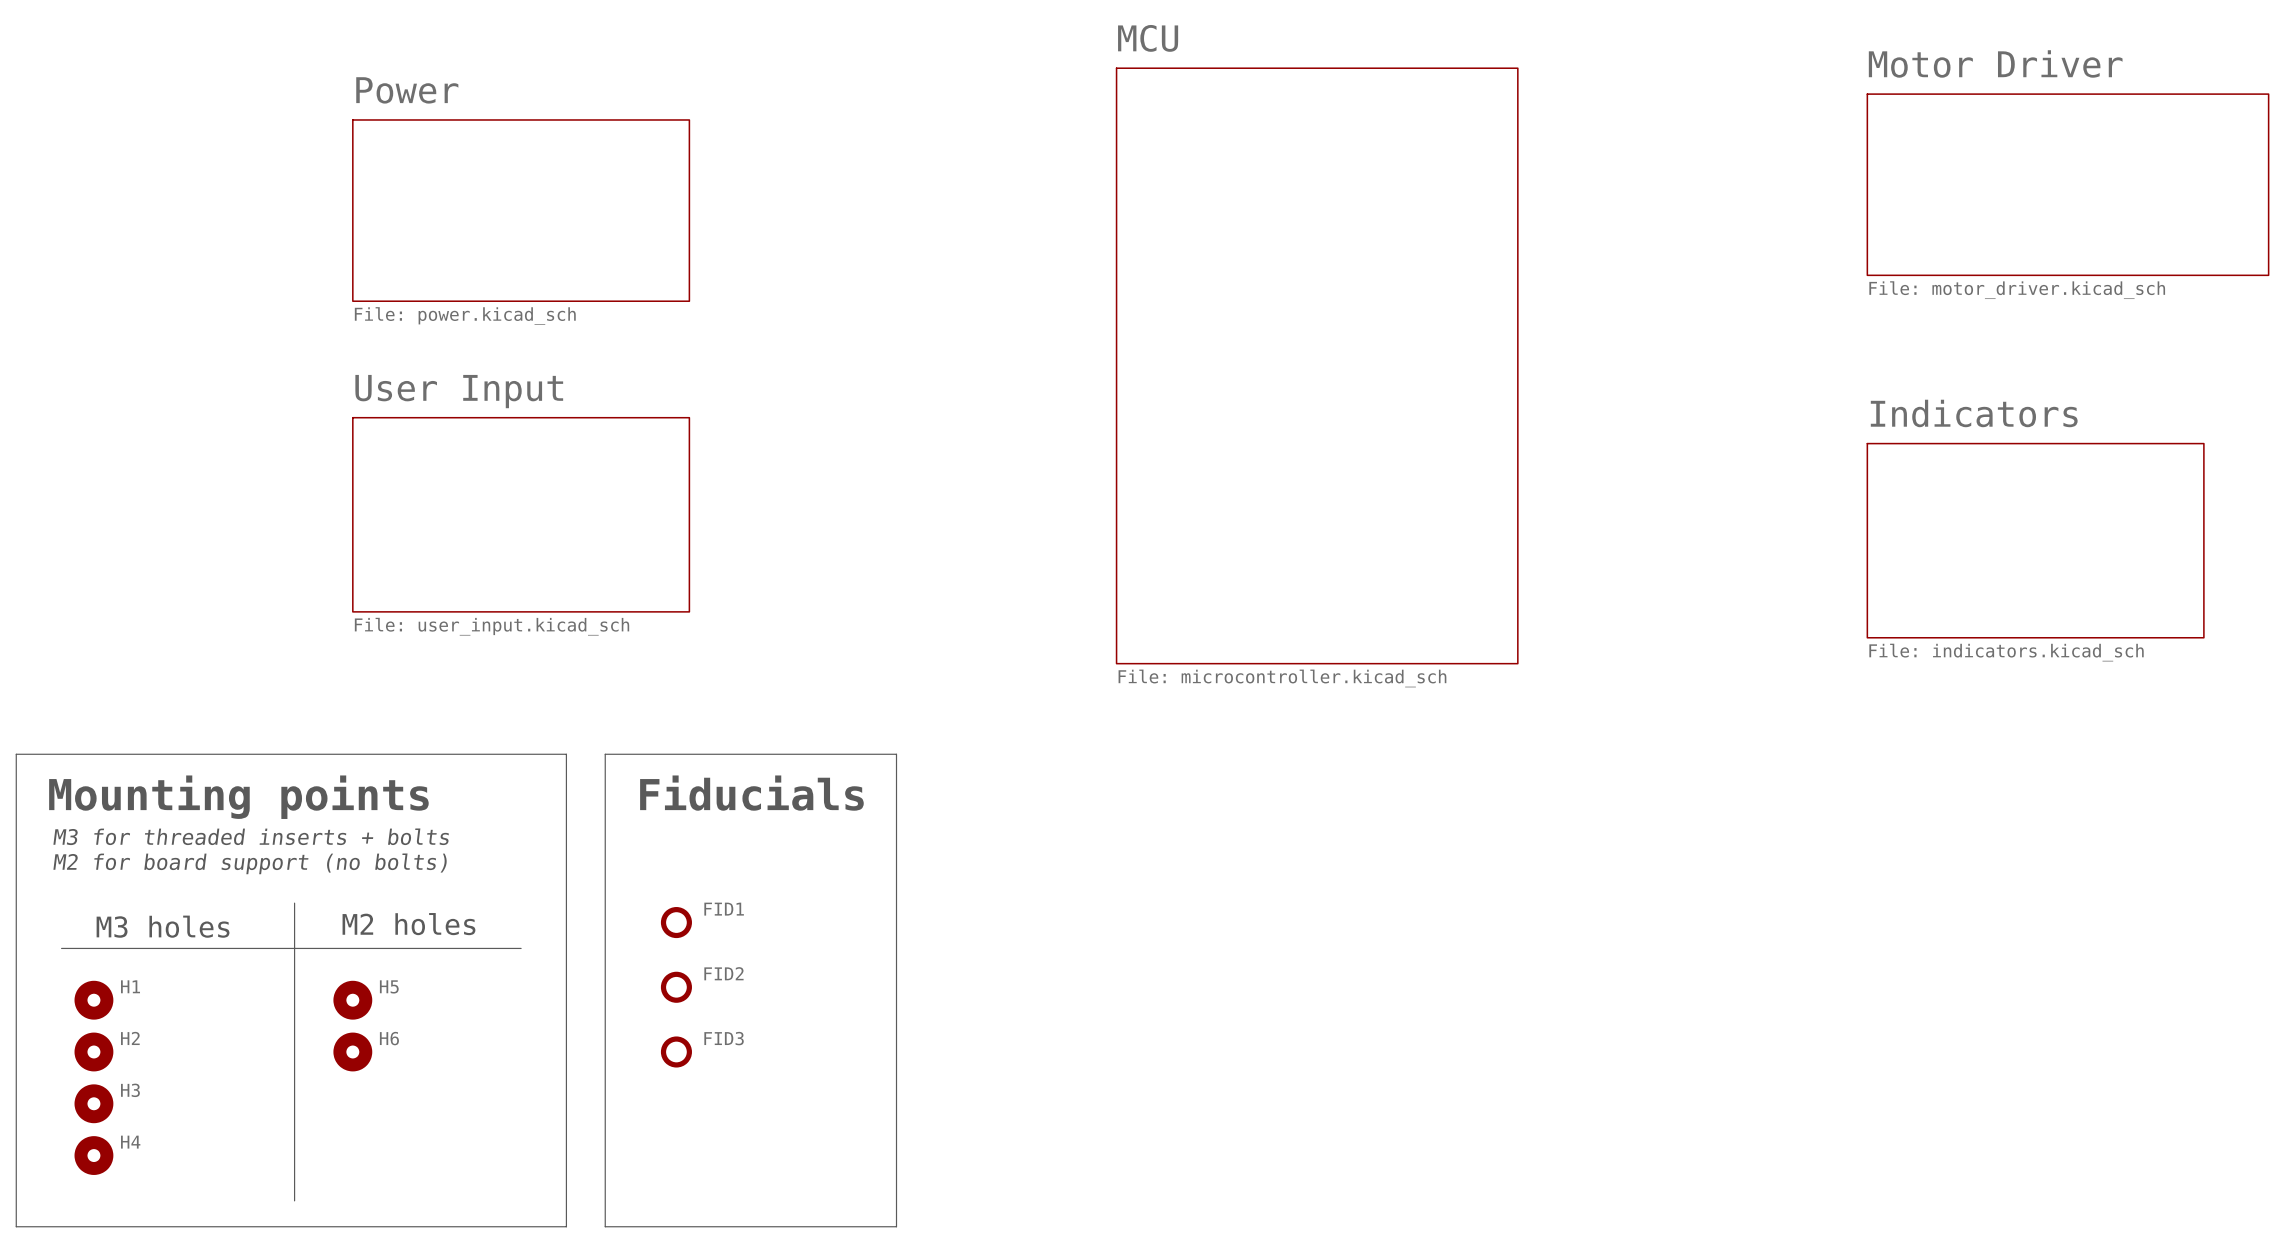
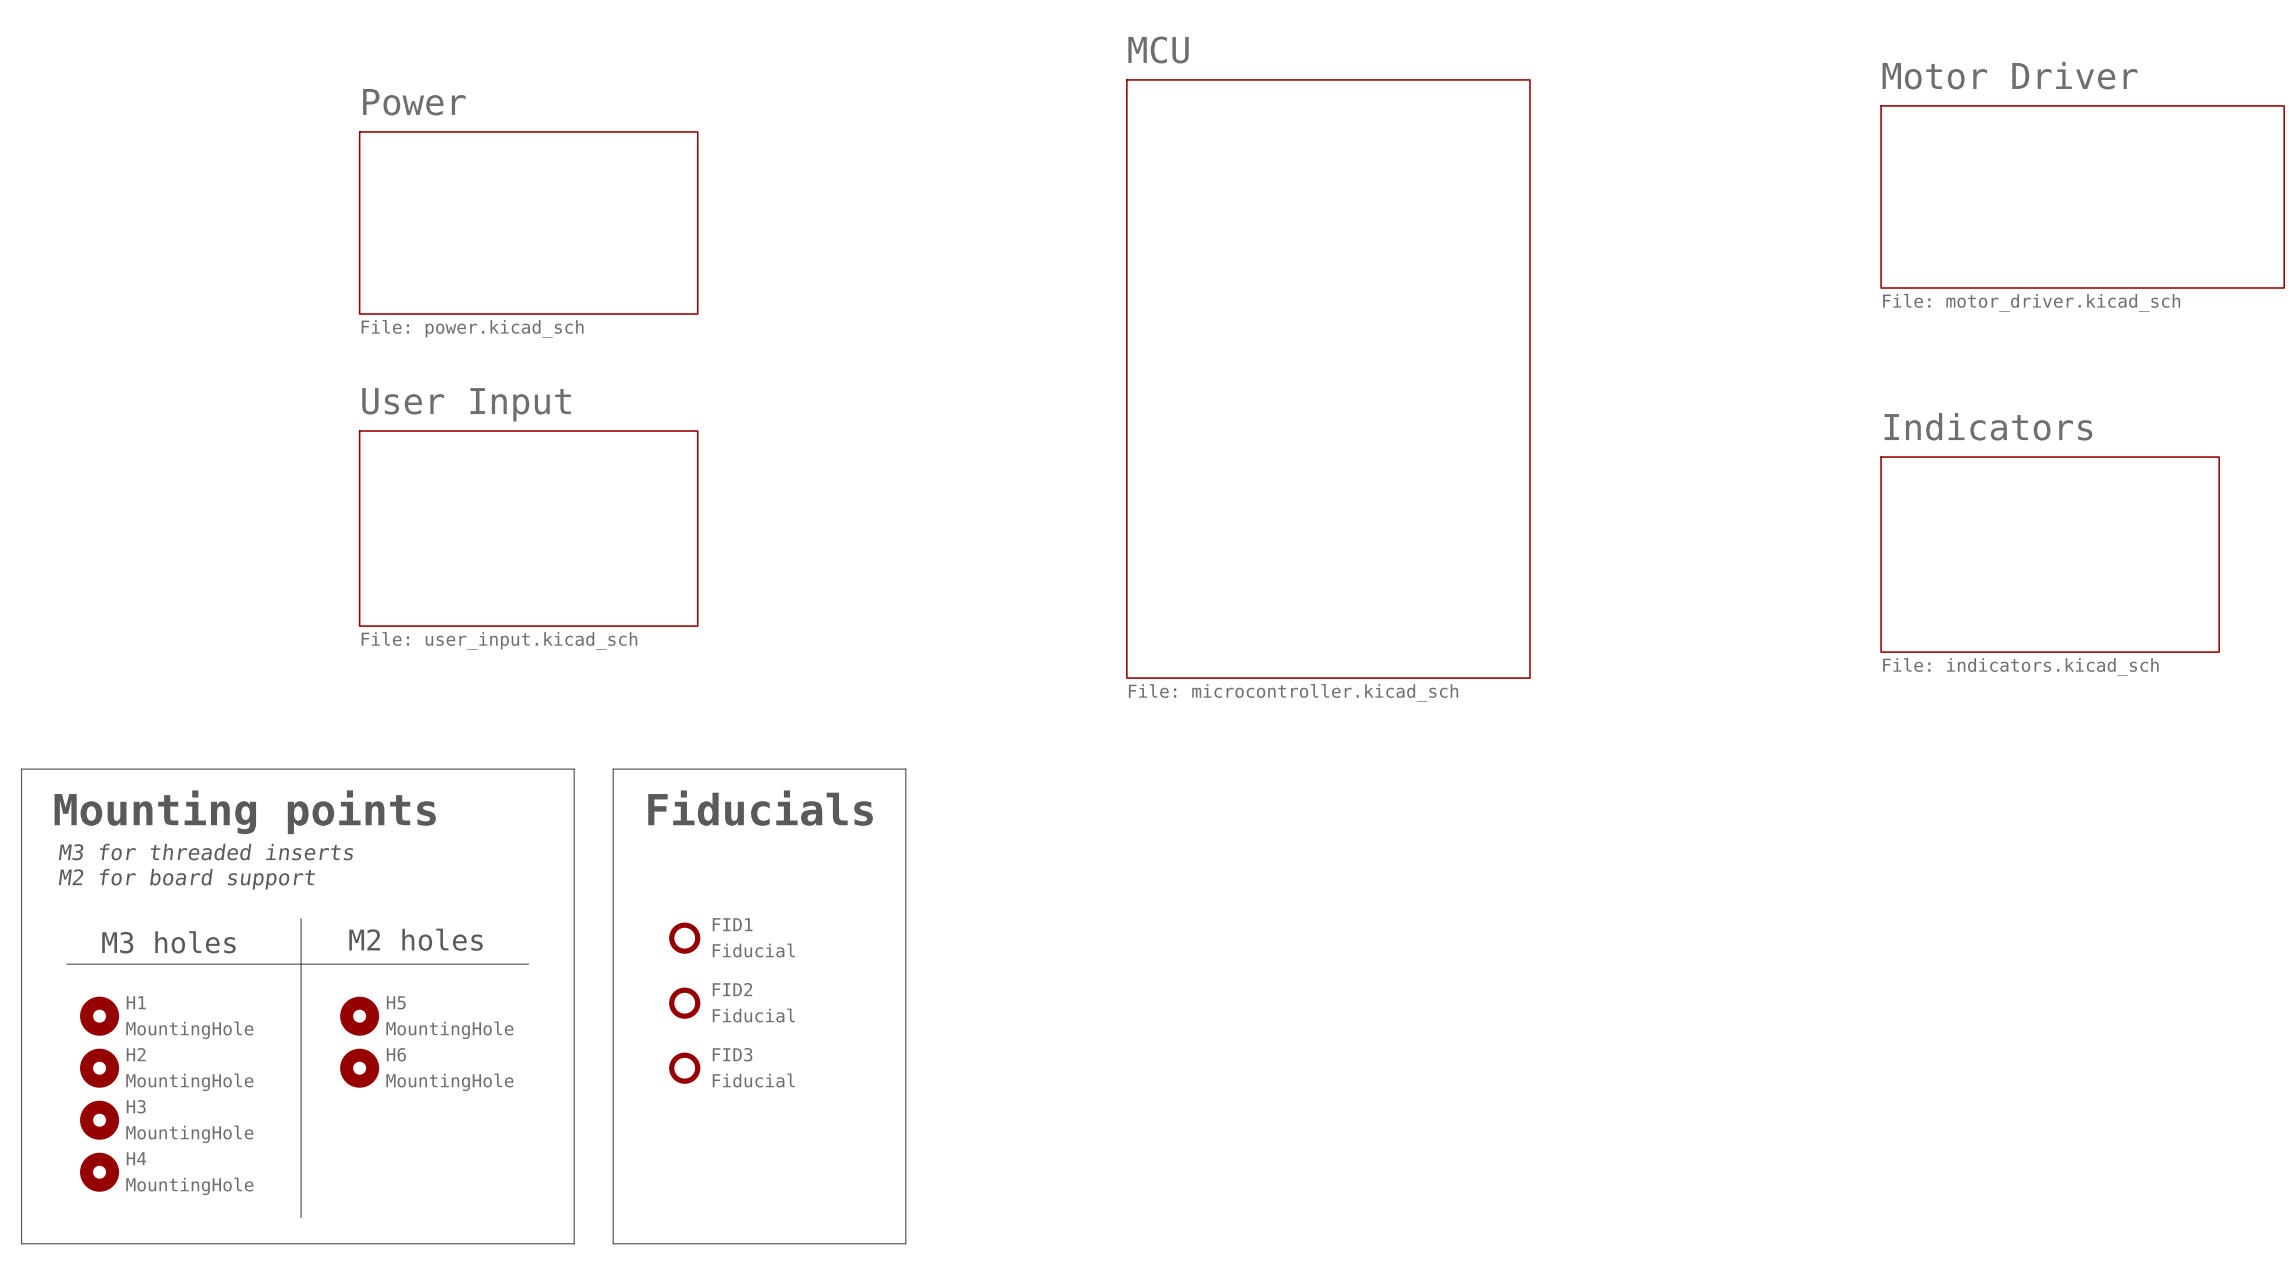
text: M3 for threaded inserts + bolts (251, 836) -> M3 for threaded inserts (205, 852)
text: M2 for board support (no bolts) (250, 863) -> M2 for board support (186, 879)
FID1 value: none -> Fiducial (753, 950)
FID2 value: none -> Fiducial (753, 1015)
H1 value: none -> MountingHole (189, 1030)
H5 value: none -> MountingHole (449, 1030)
FID3 value: none -> Fiducial (753, 1080)
H2 value: none -> MountingHole (189, 1082)
H6 value: none -> MountingHole (449, 1082)
H3 value: none -> MountingHole (189, 1134)
H4 value: none -> MountingHole (189, 1186)

